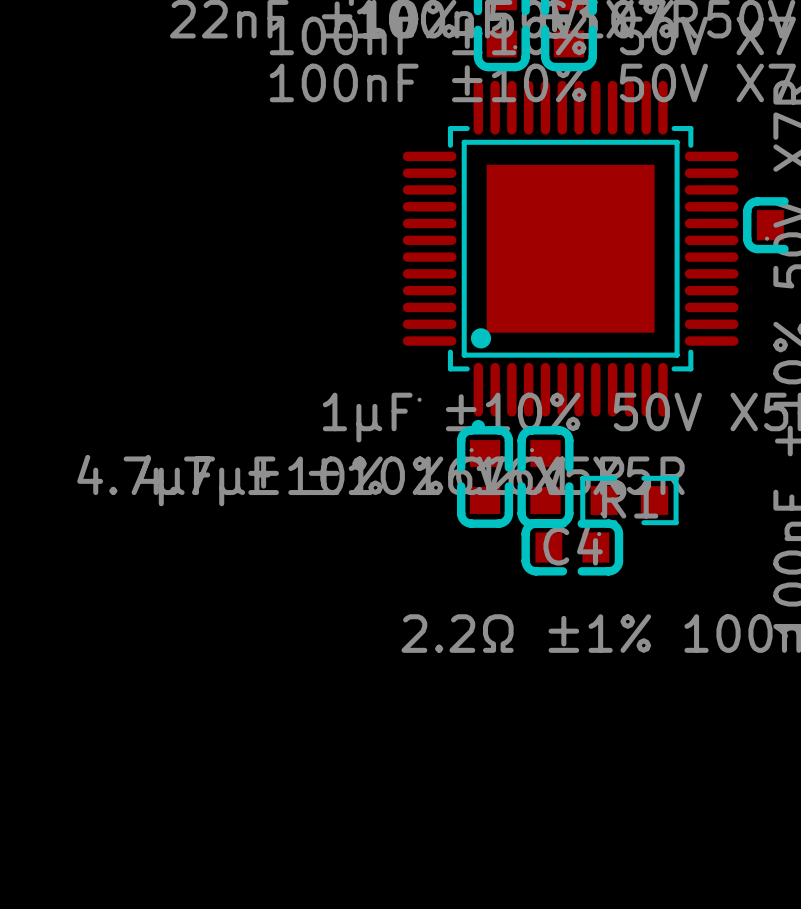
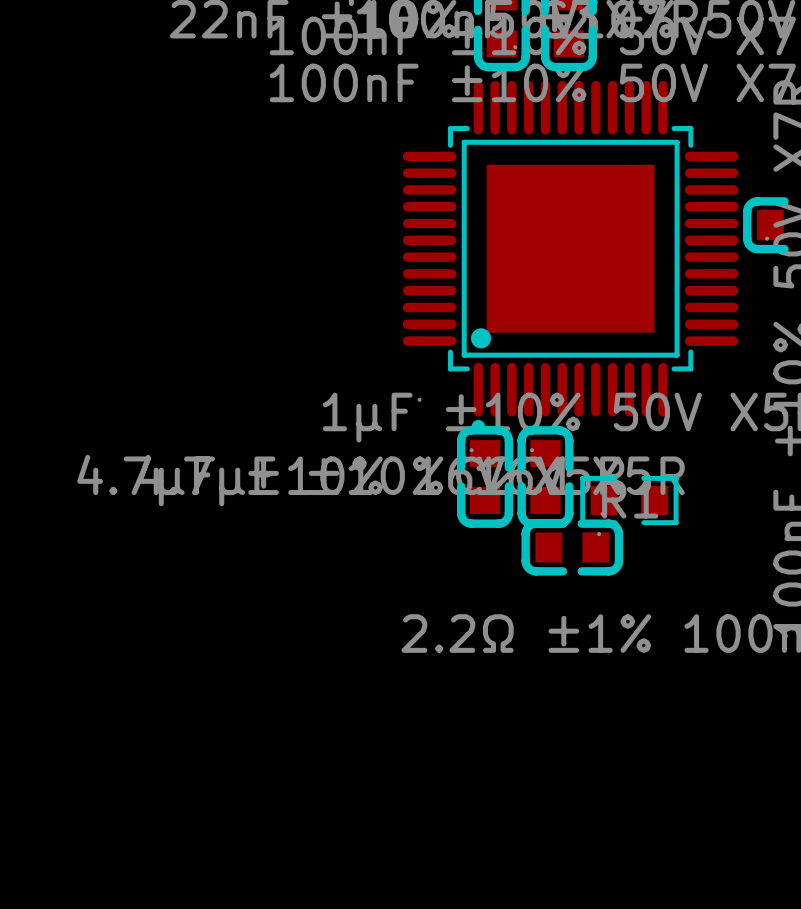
C4 name: C4 (573, 545) -> none

